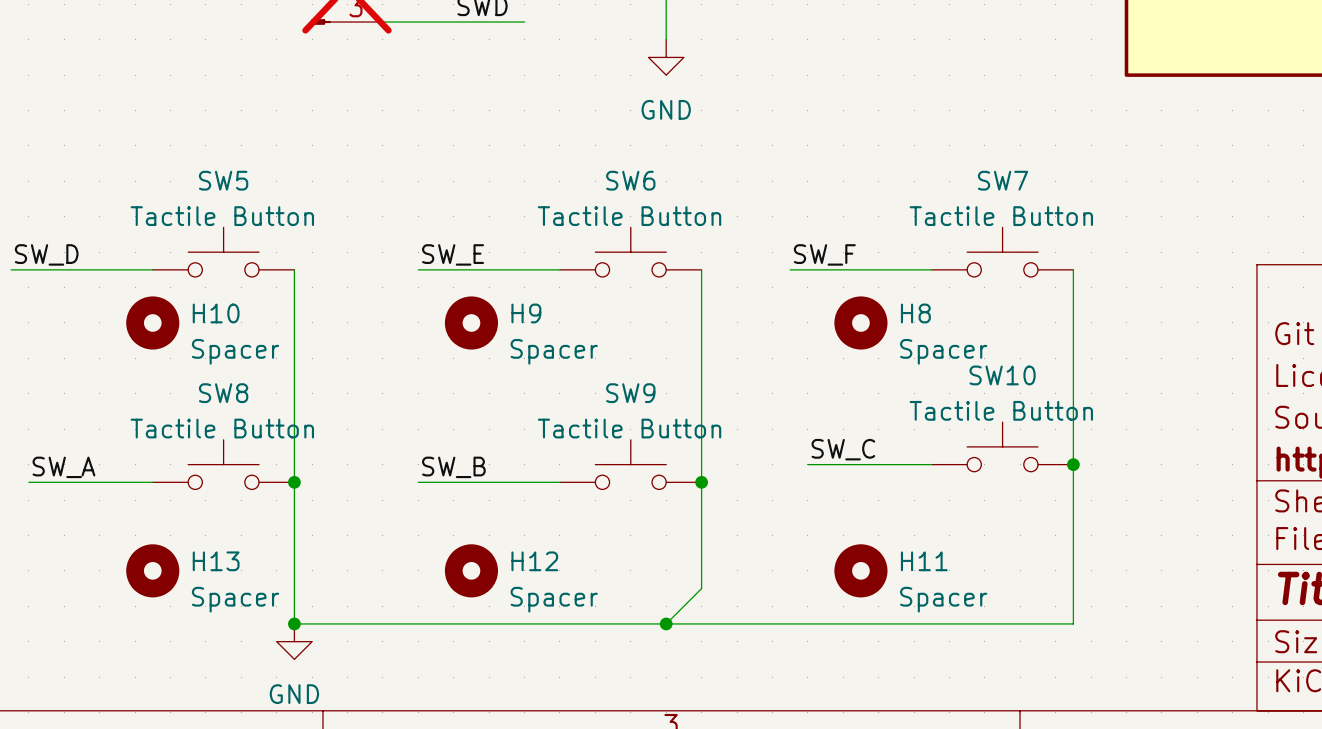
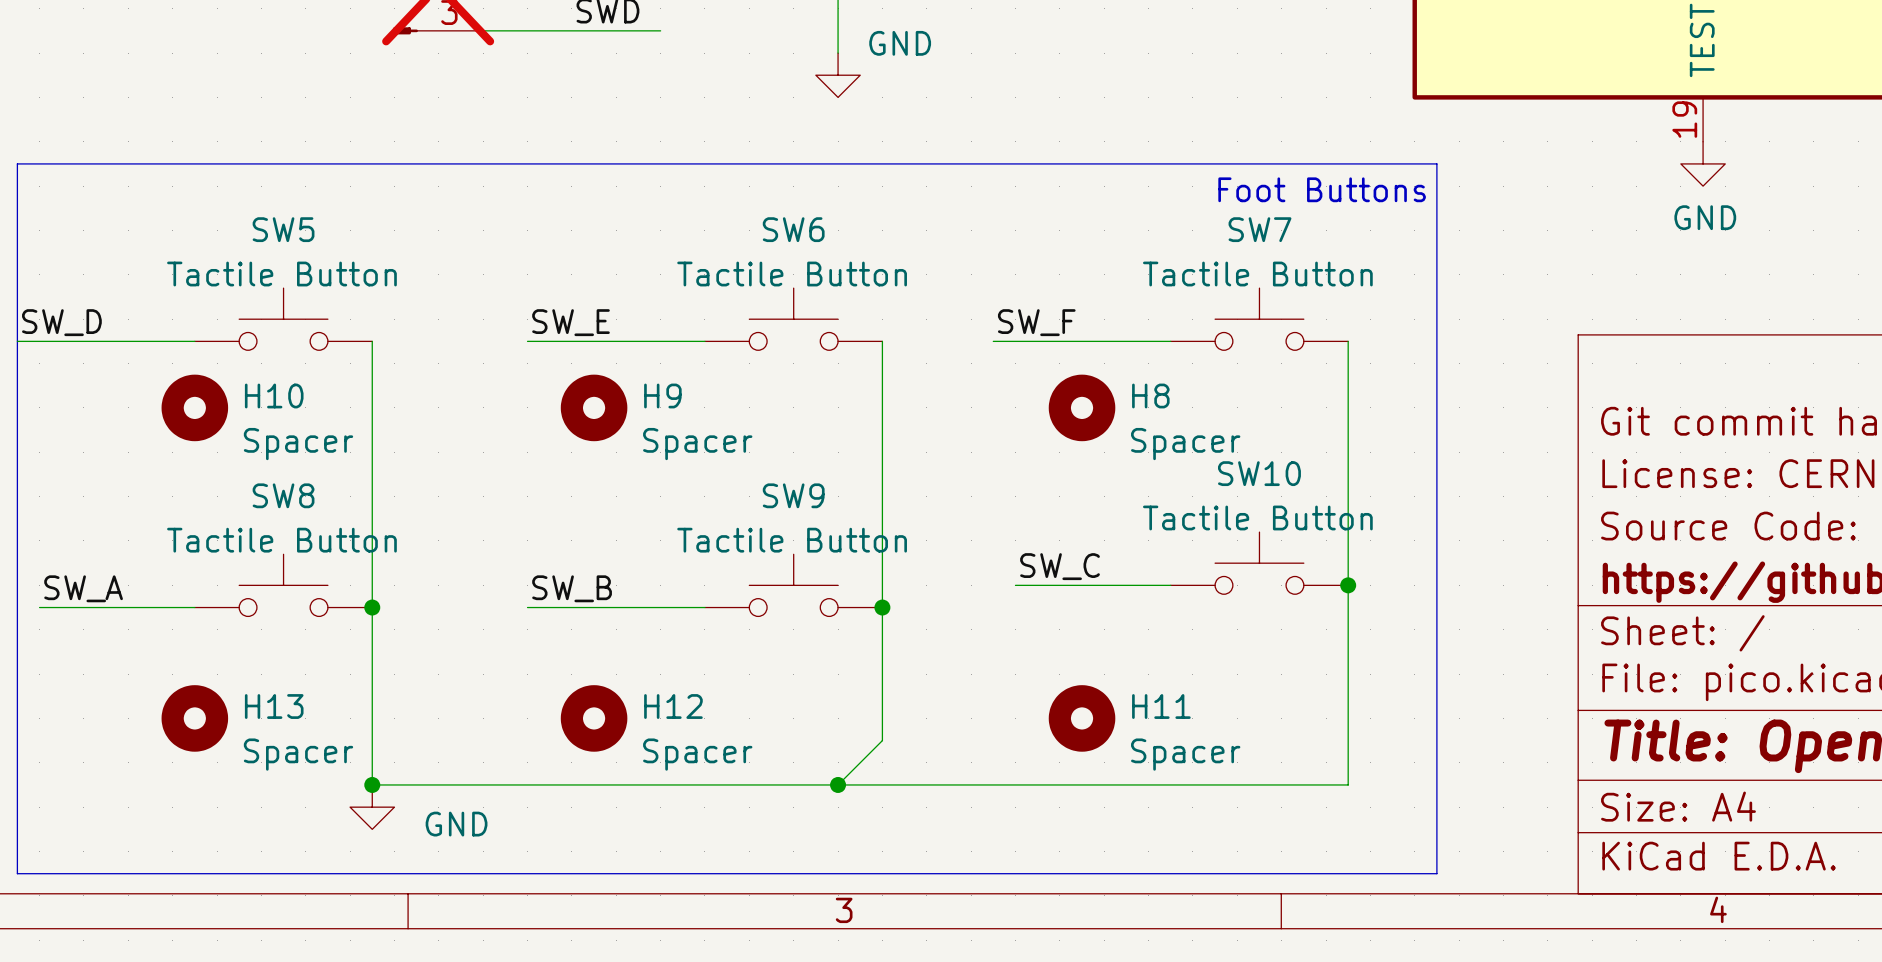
power symbol text position: GND (666, 109) -> GND (900, 43)
line: none -> (17, 163) (1436, 163) (1436, 873) (17, 873) (17, 163)
text: none -> Foot Buttons (1322, 189)
power symbol text position: GND (294, 694) -> GND (456, 824)

